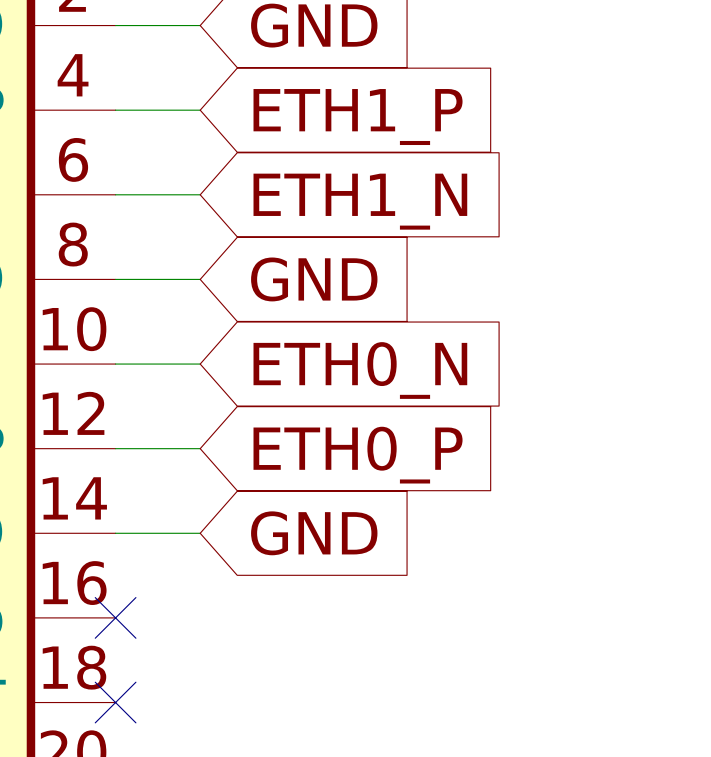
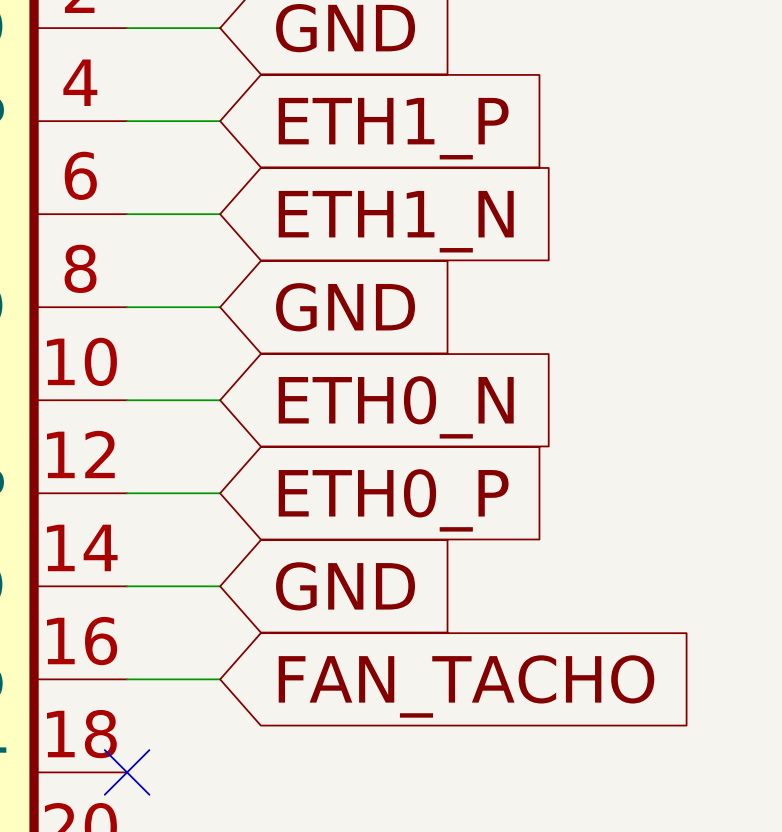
wire: none -> (127, 679) (220, 679)
no-connect mark: (115, 617) -> none
global label: none -> FAN_TACHO (466, 686)

